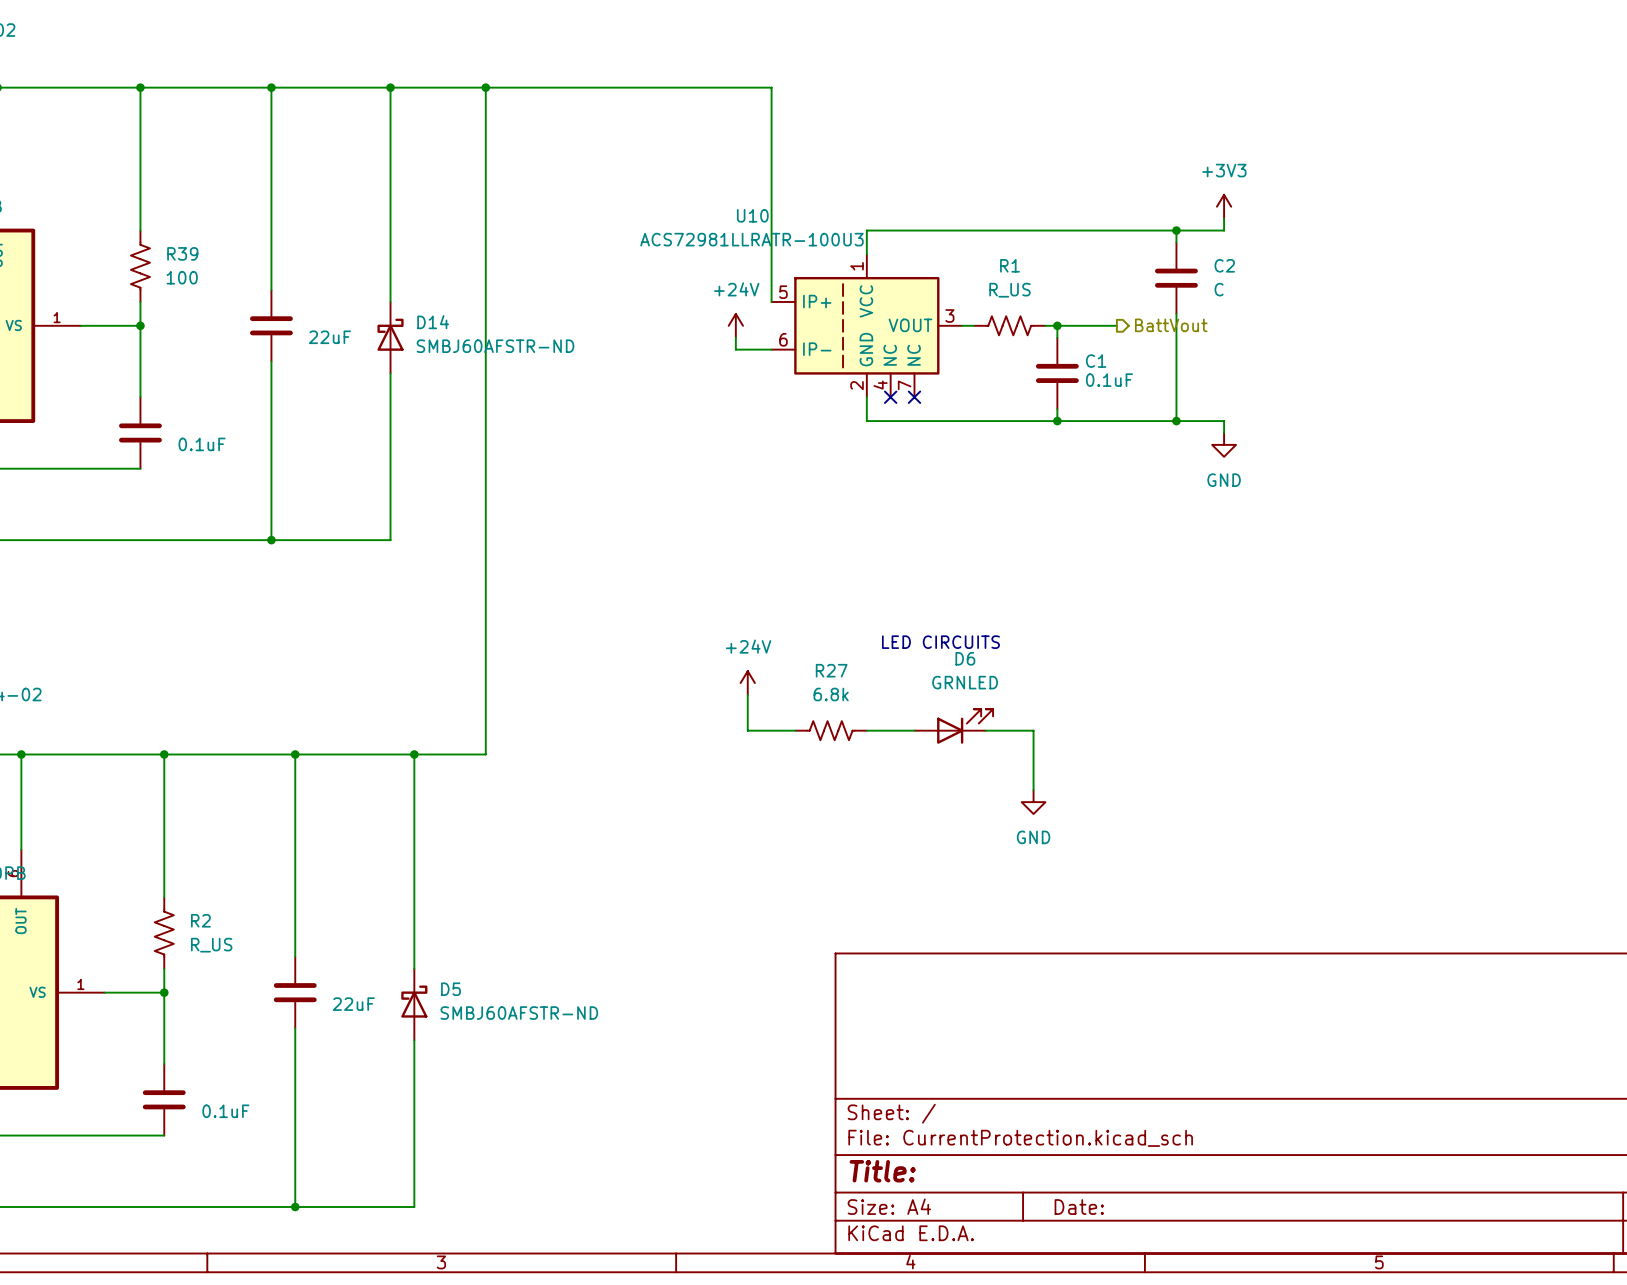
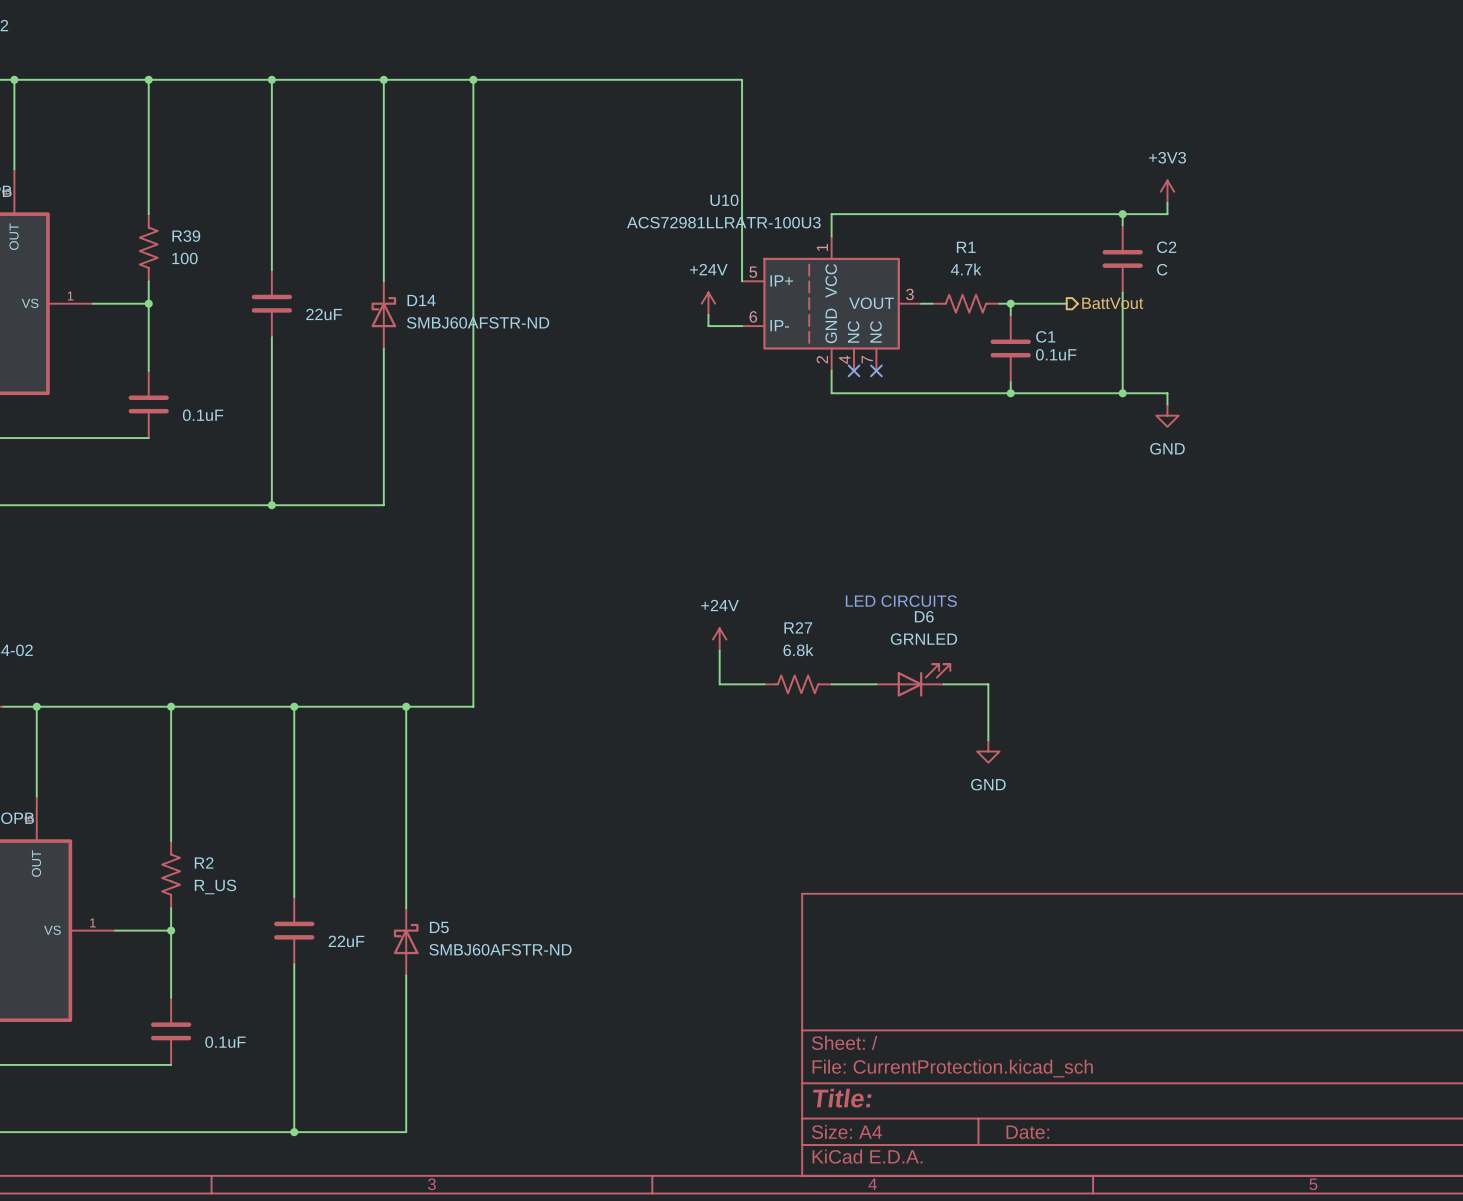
R1 value: R_US (1010, 290) -> 4.7k (966, 269)

